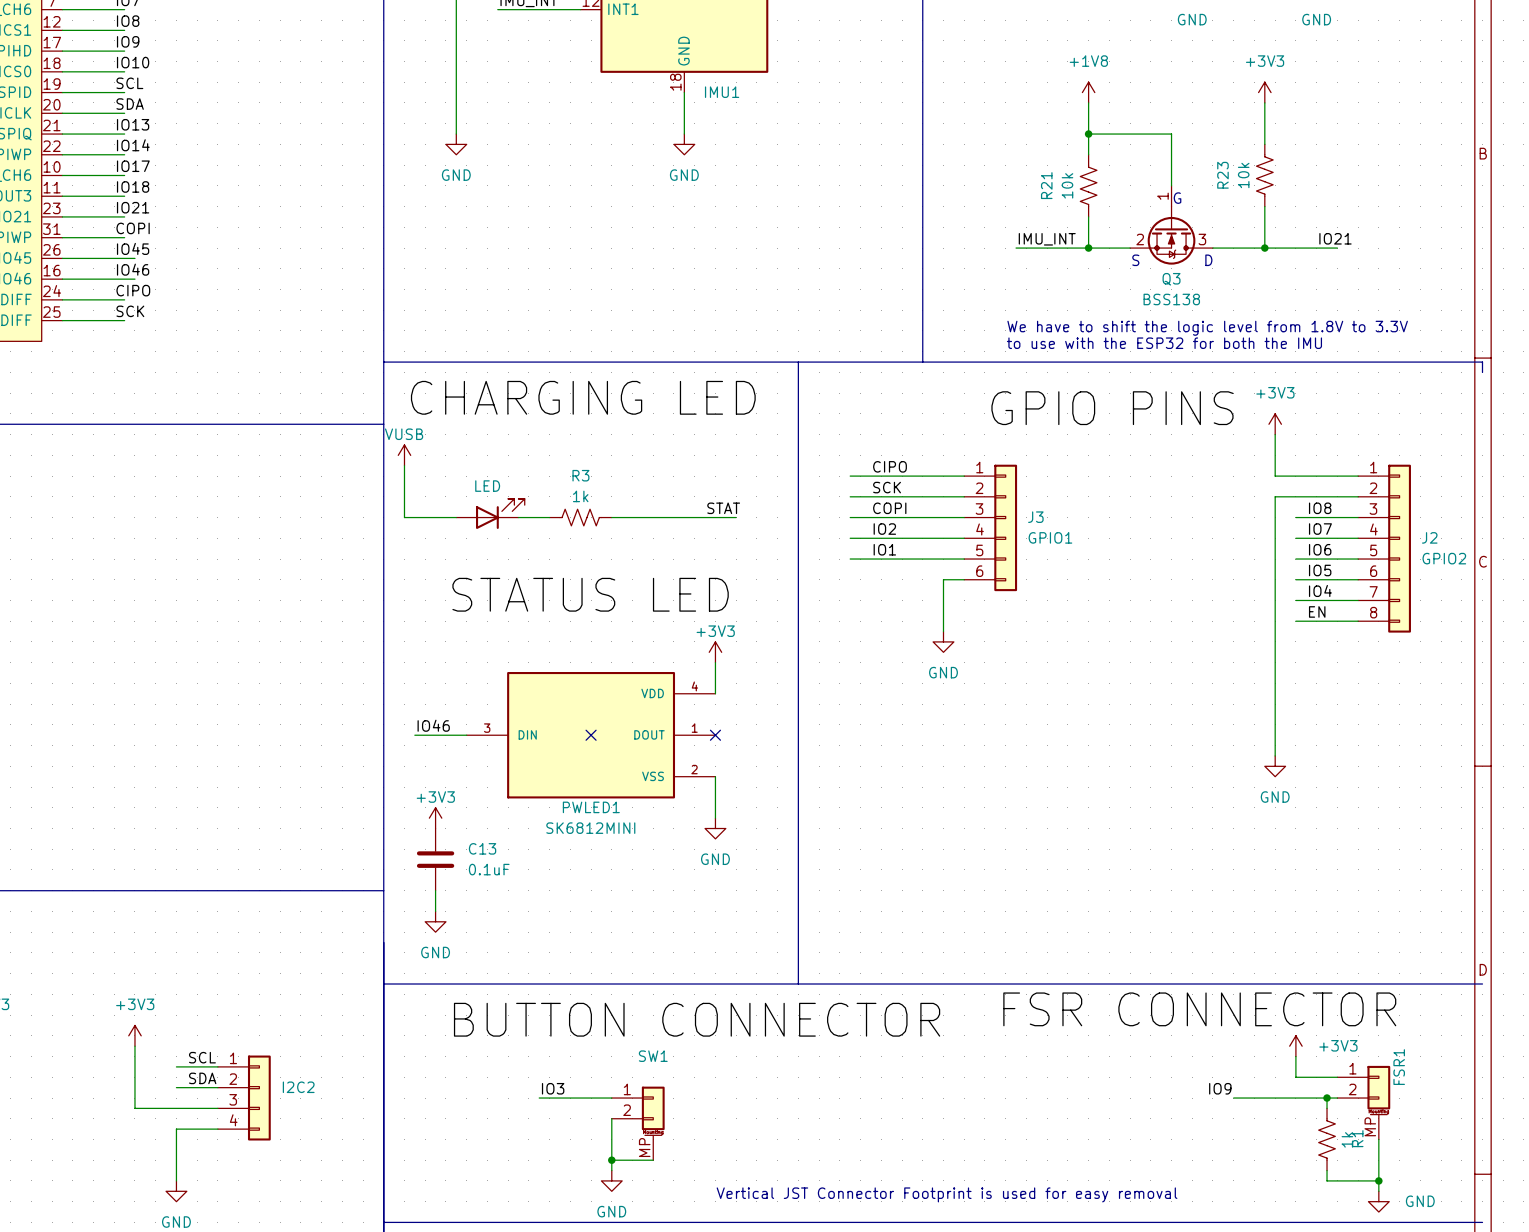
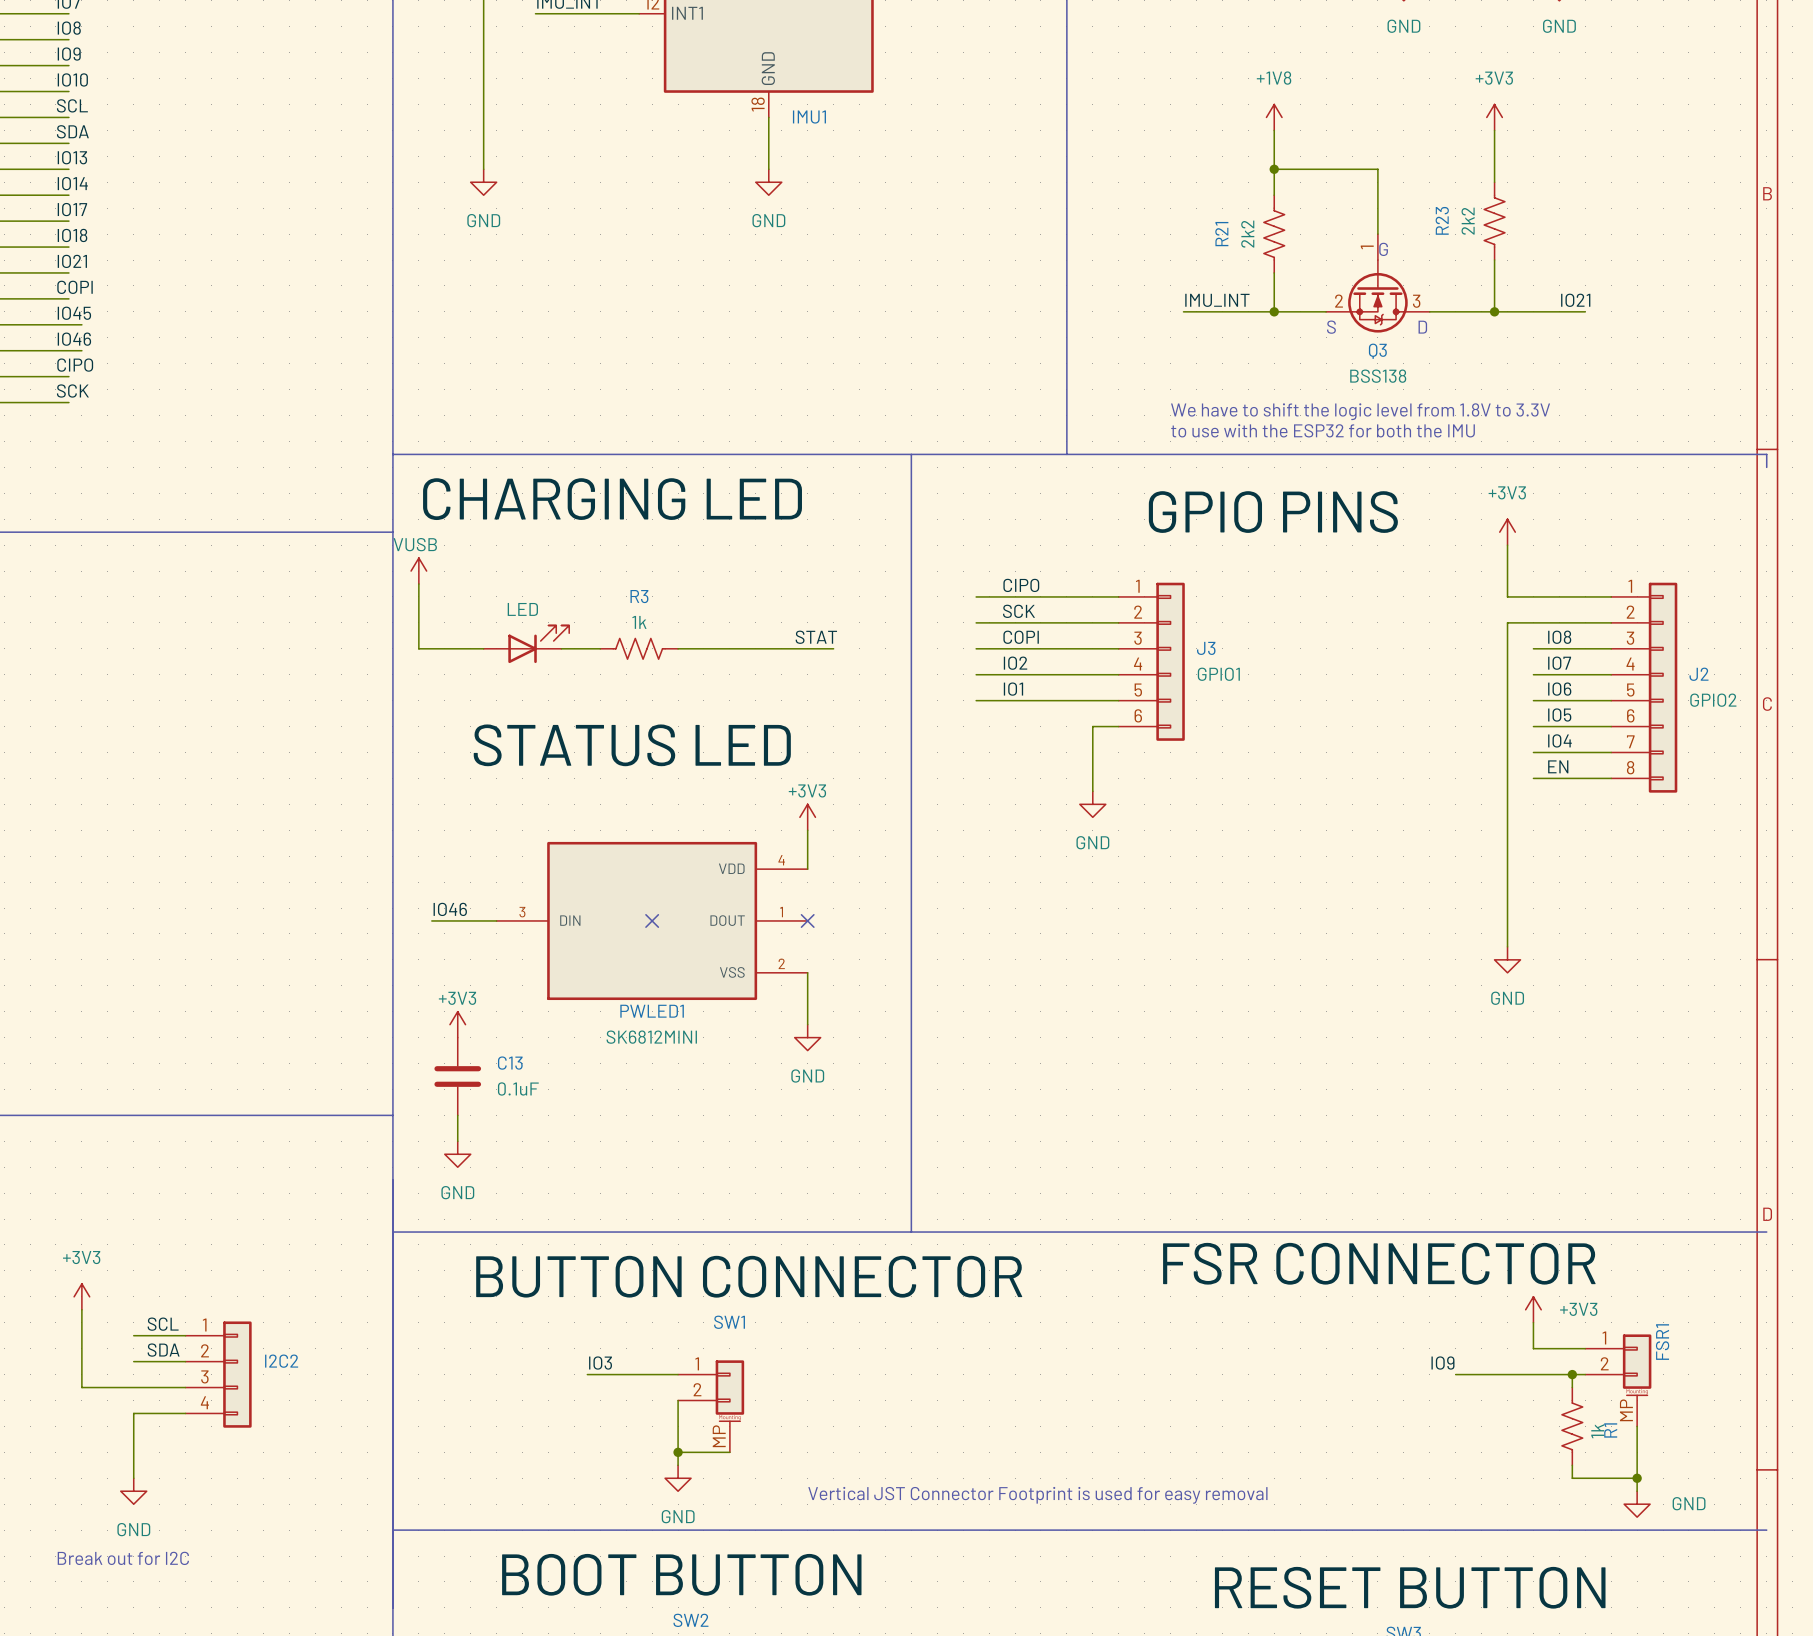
R23 value: 10k (1243, 175) -> 2k2 (1468, 221)
R21 value: 10k (1067, 185) -> 2k2 (1247, 234)

